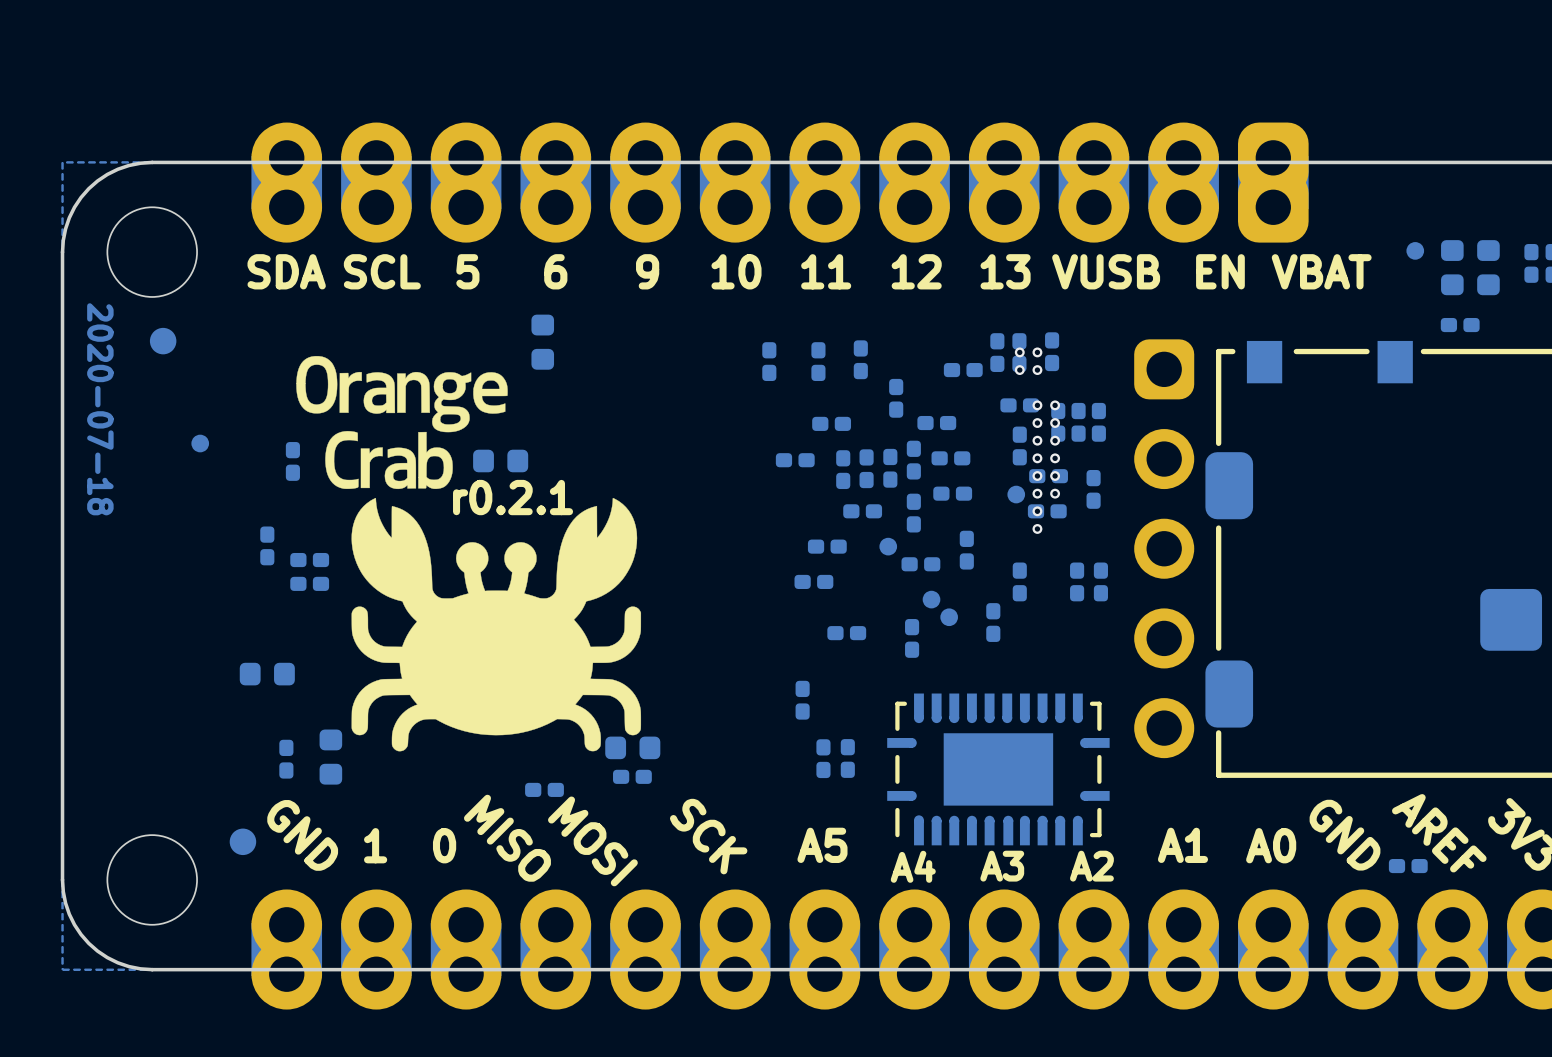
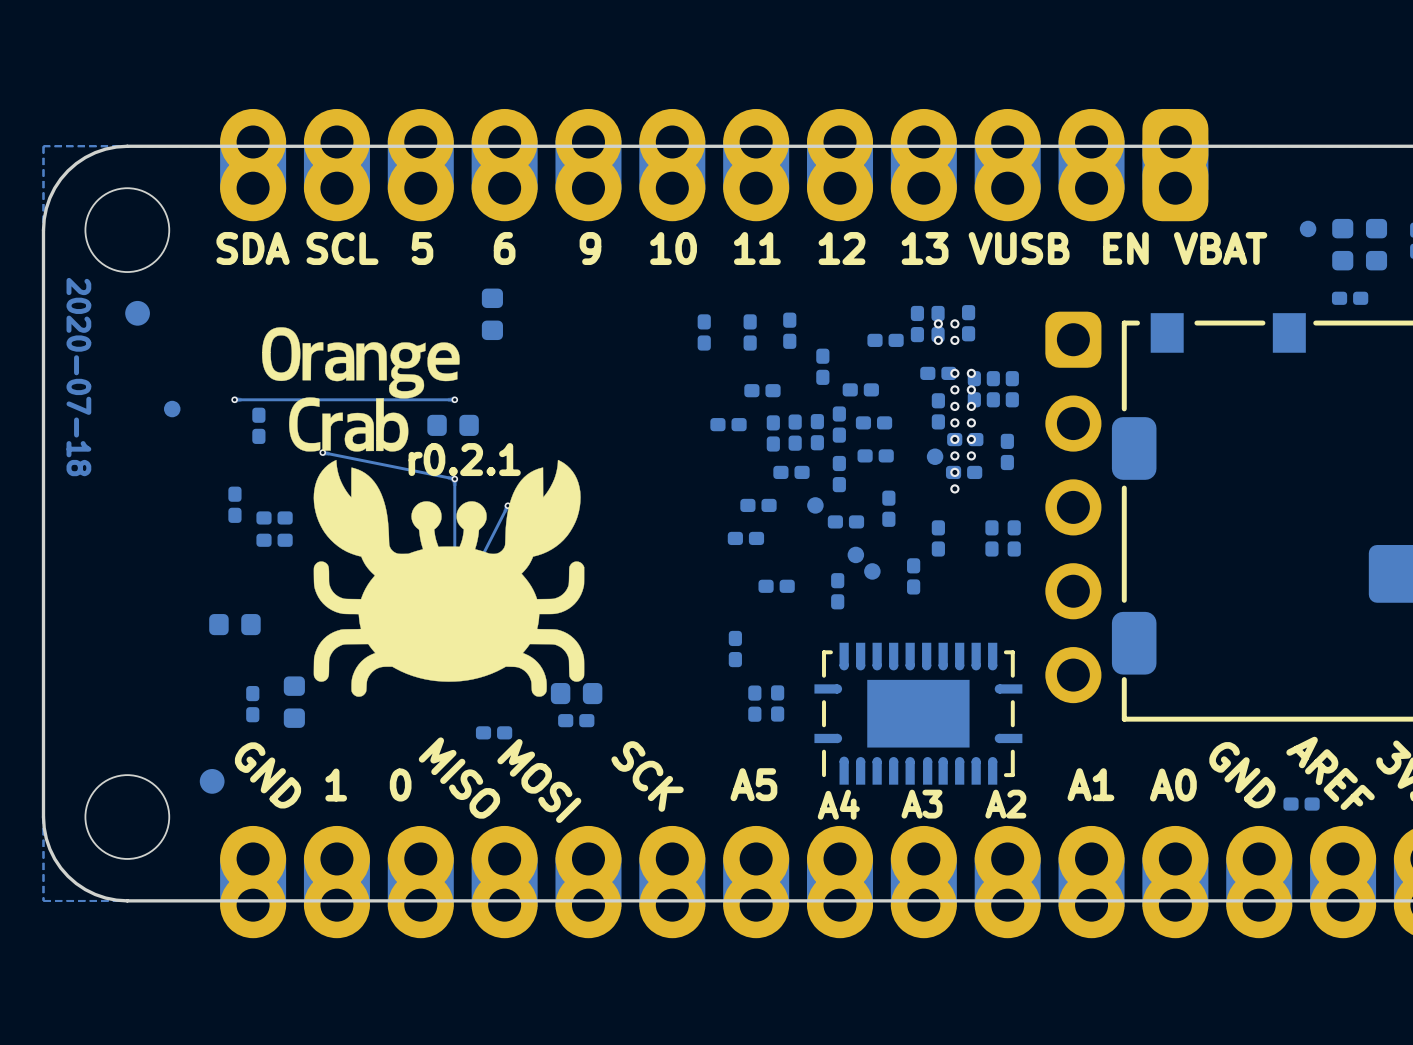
via: none -> (234, 399)
track: none -> (454, 399) (234, 399)
via: none -> (454, 399)
track: none -> (322, 452) (454, 479) (454, 558) (481, 611)
via: none -> (322, 452)
via: none -> (454, 479)
track: none -> (507, 505) (481, 558)
via: none -> (507, 505)

